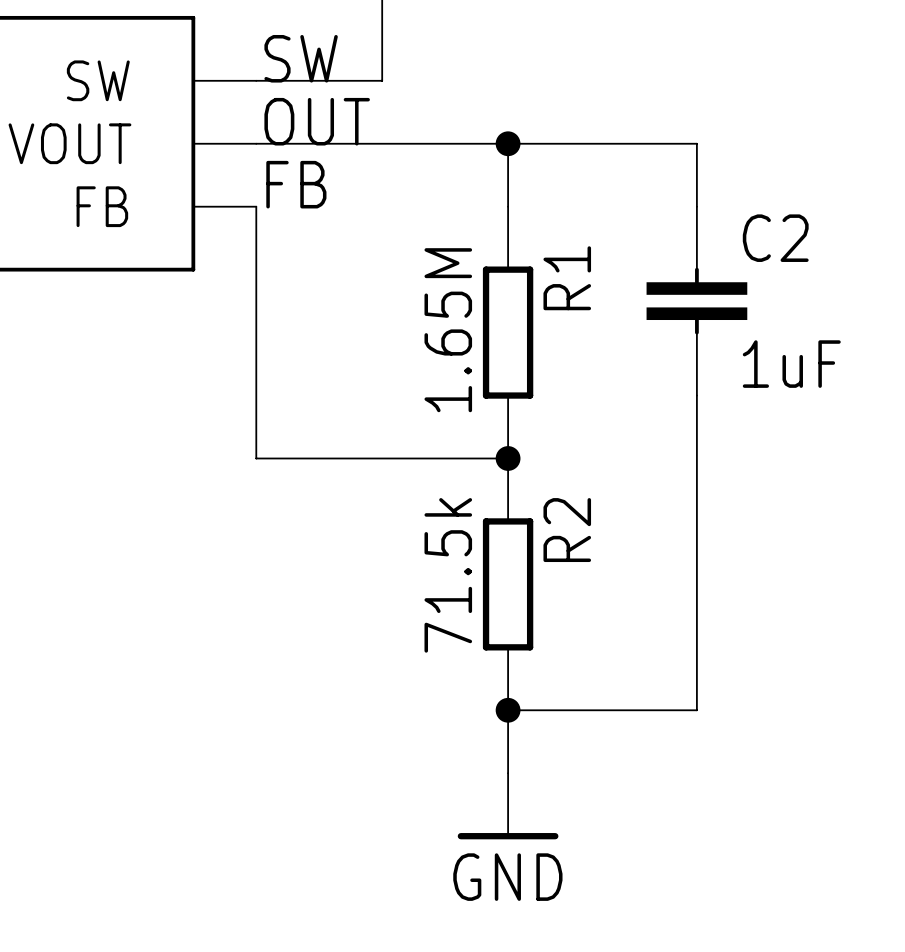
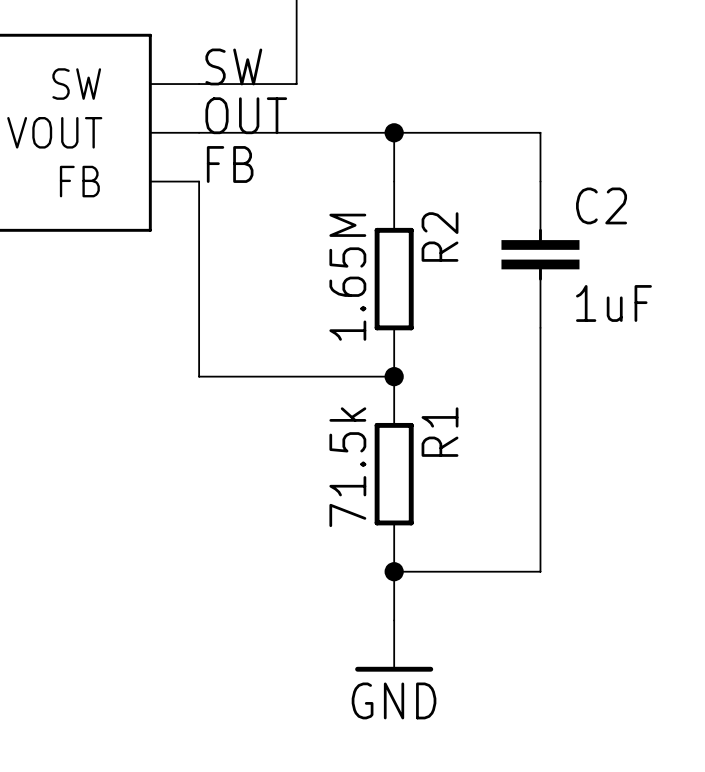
R1 name: R1 (567, 278) -> R2 (440, 237)
R2 name: R2 (567, 530) -> R1 (440, 432)

